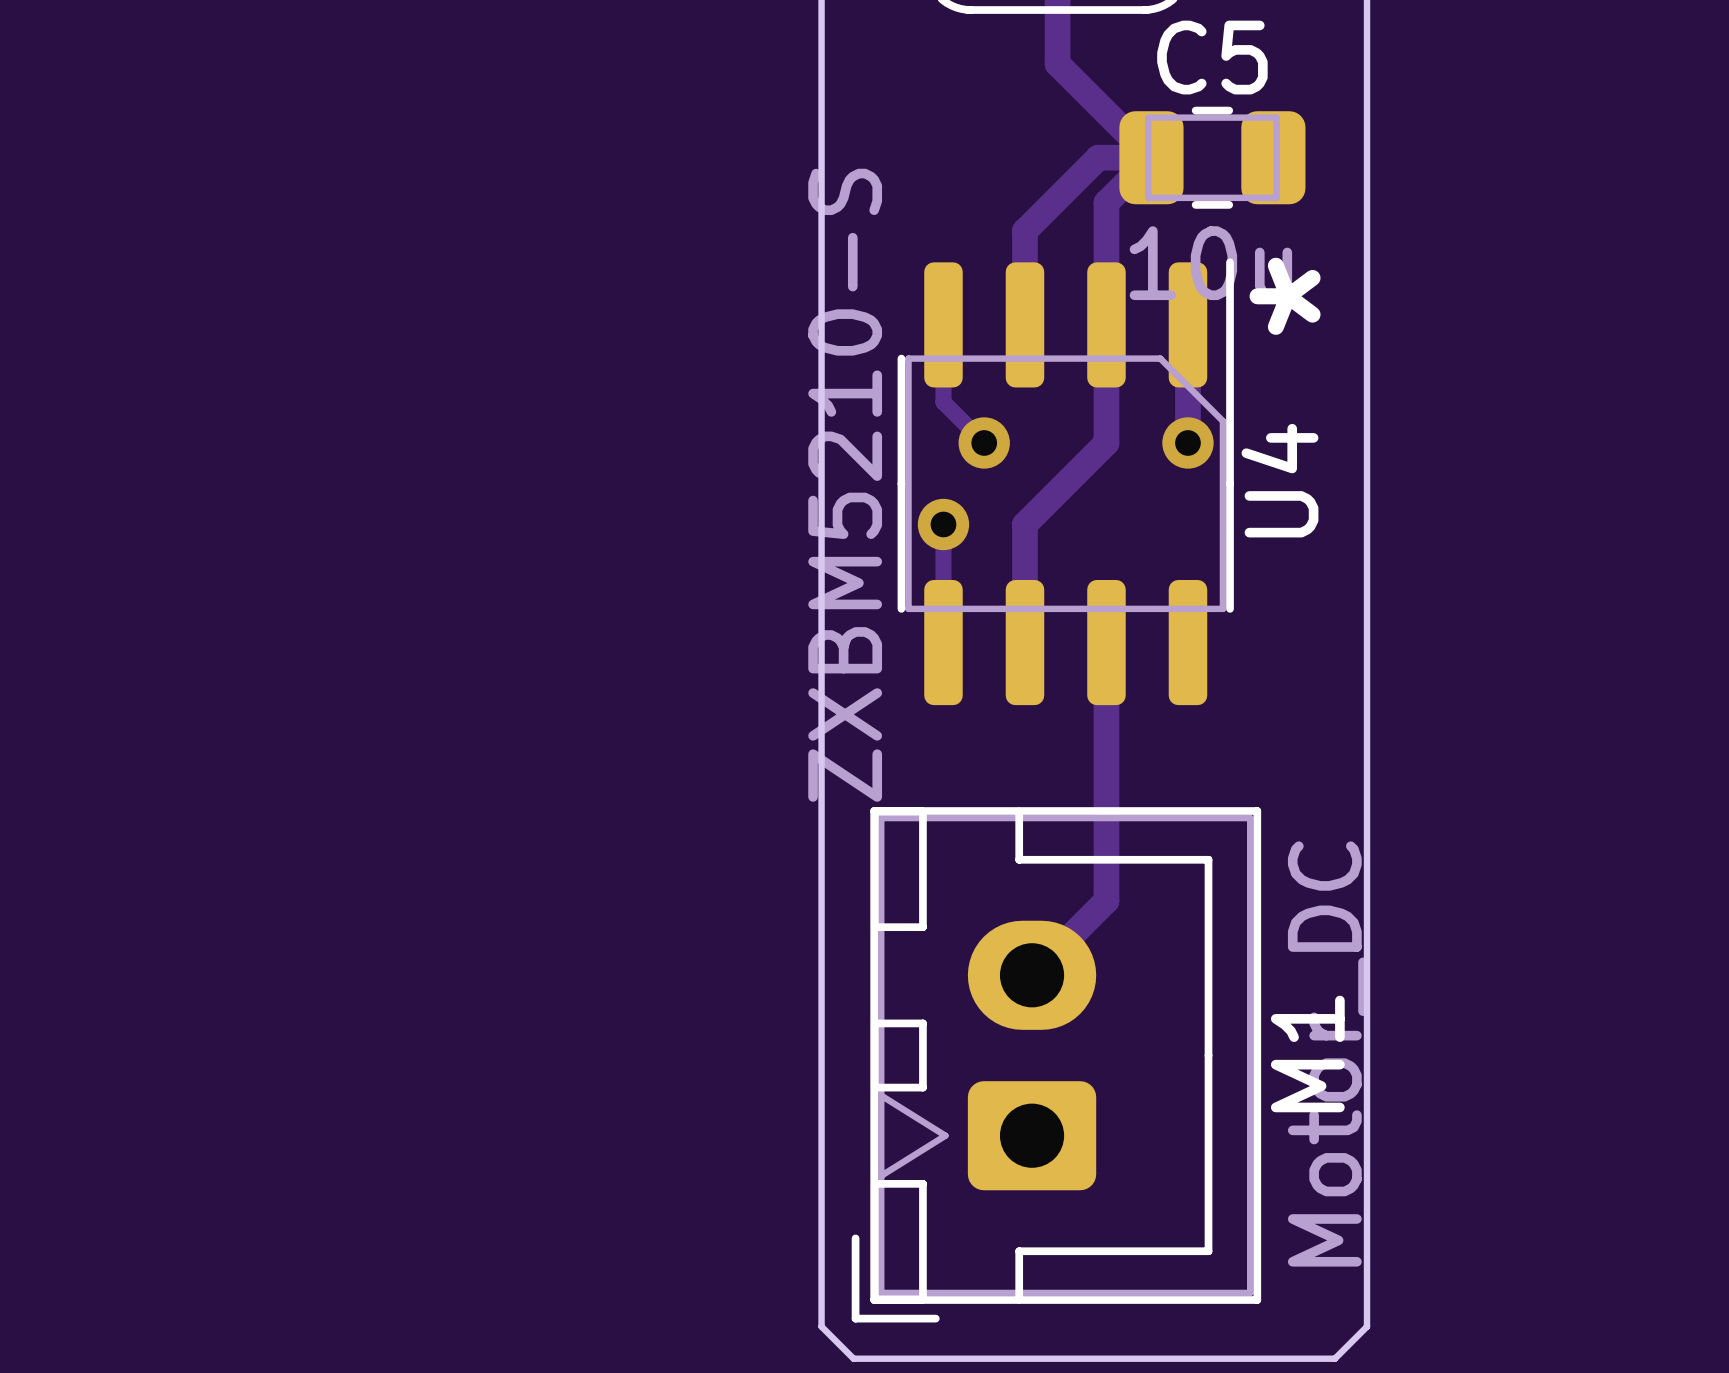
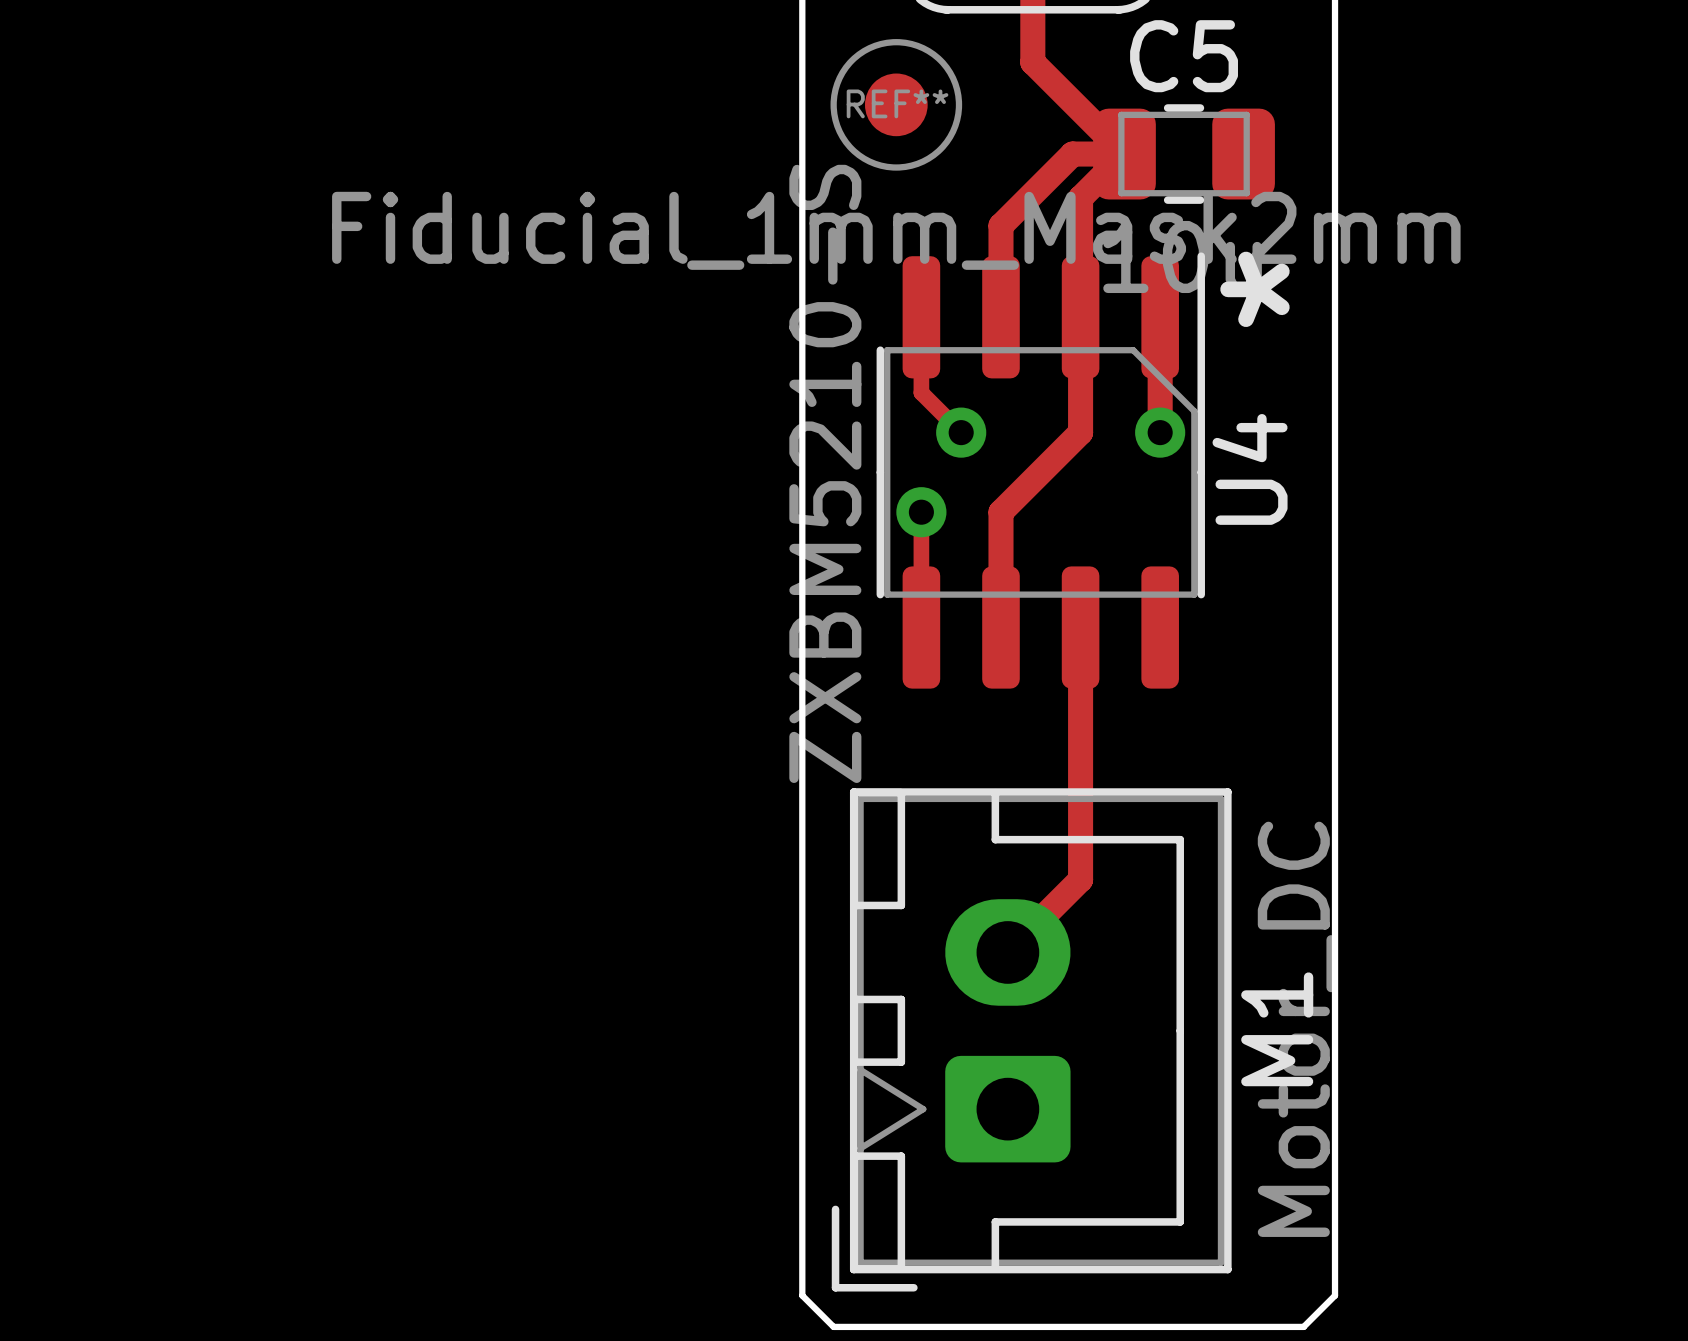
REF**: none -> Fiducial_1mm_Mask2mm (896, 104)

